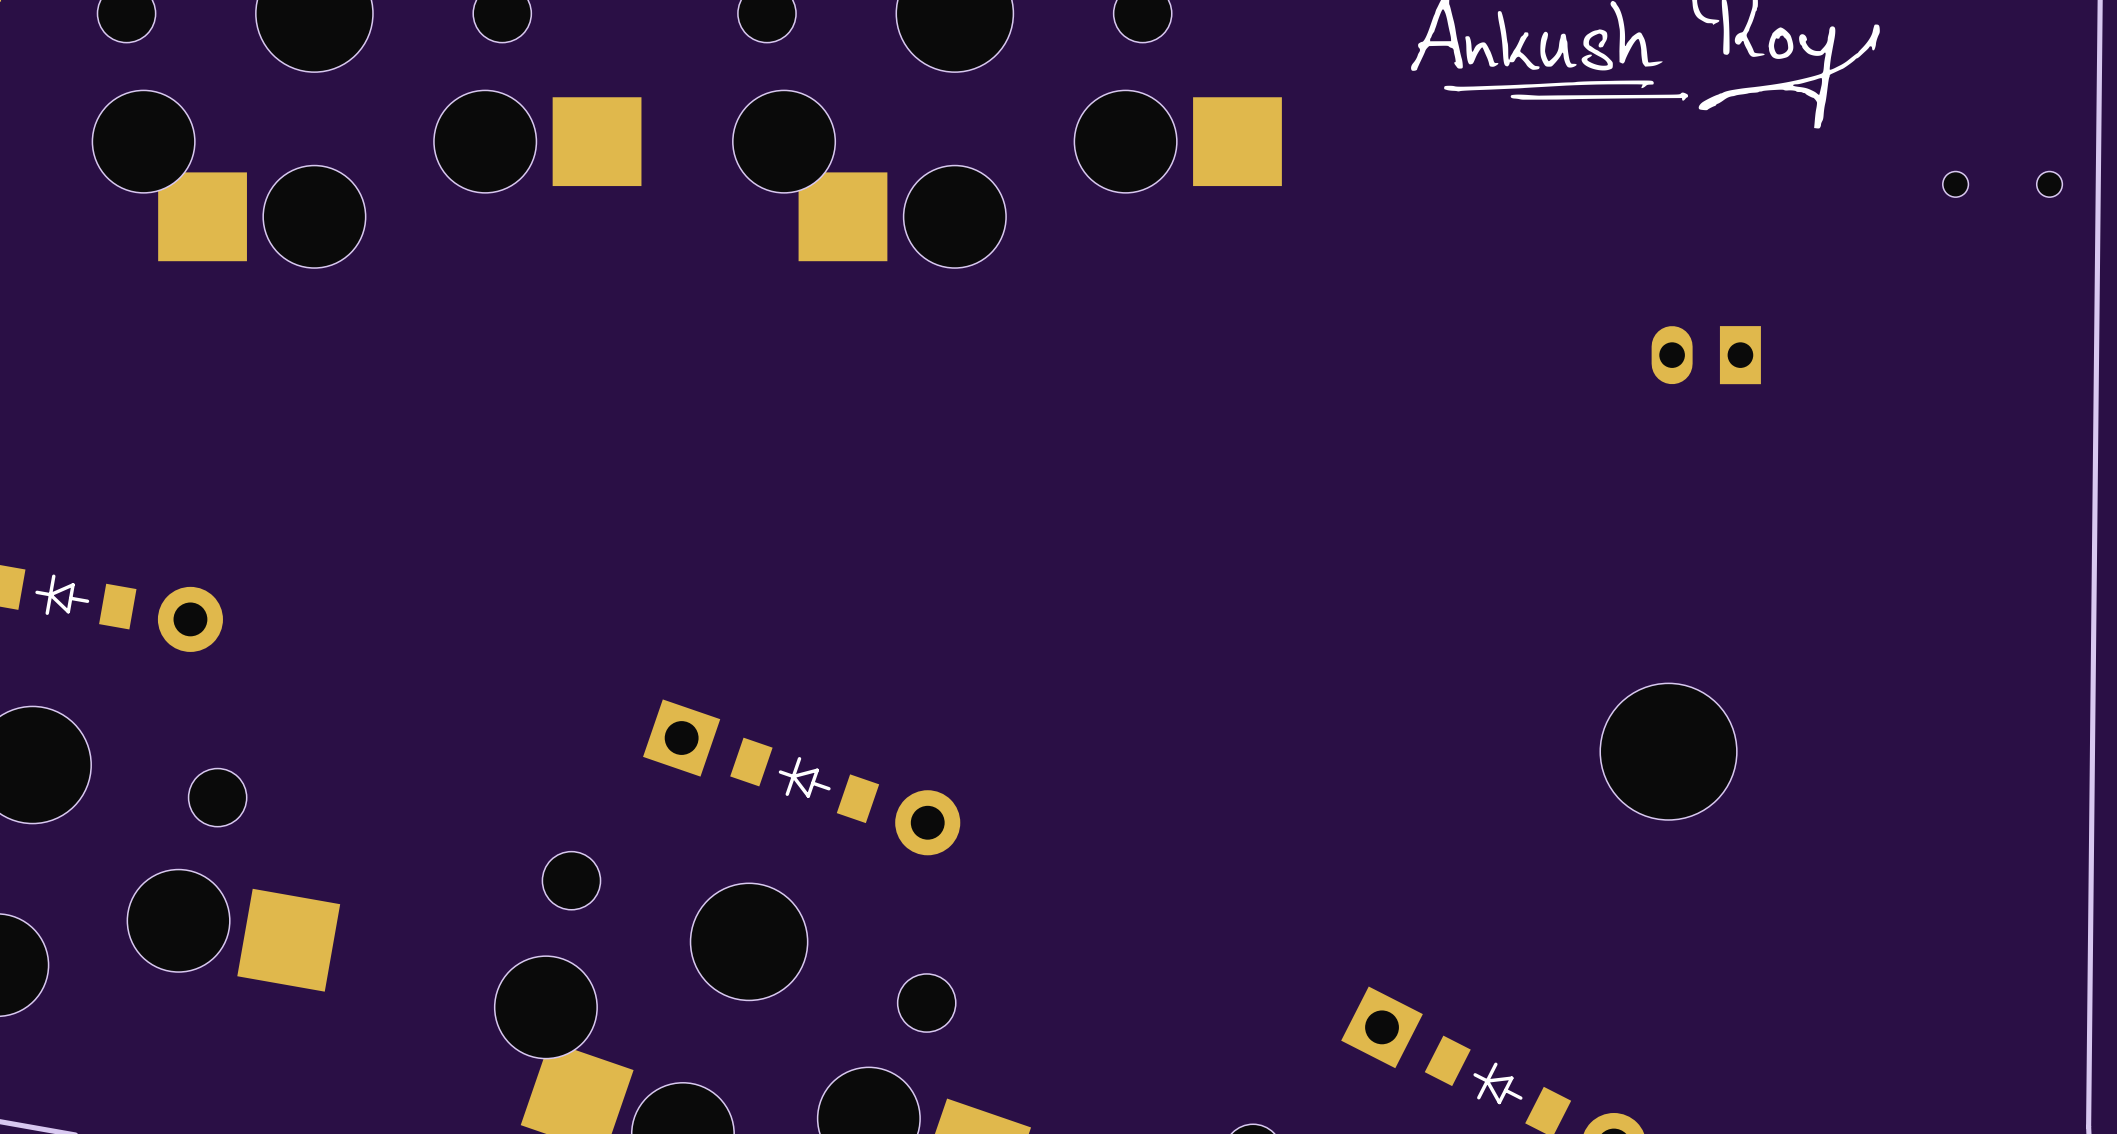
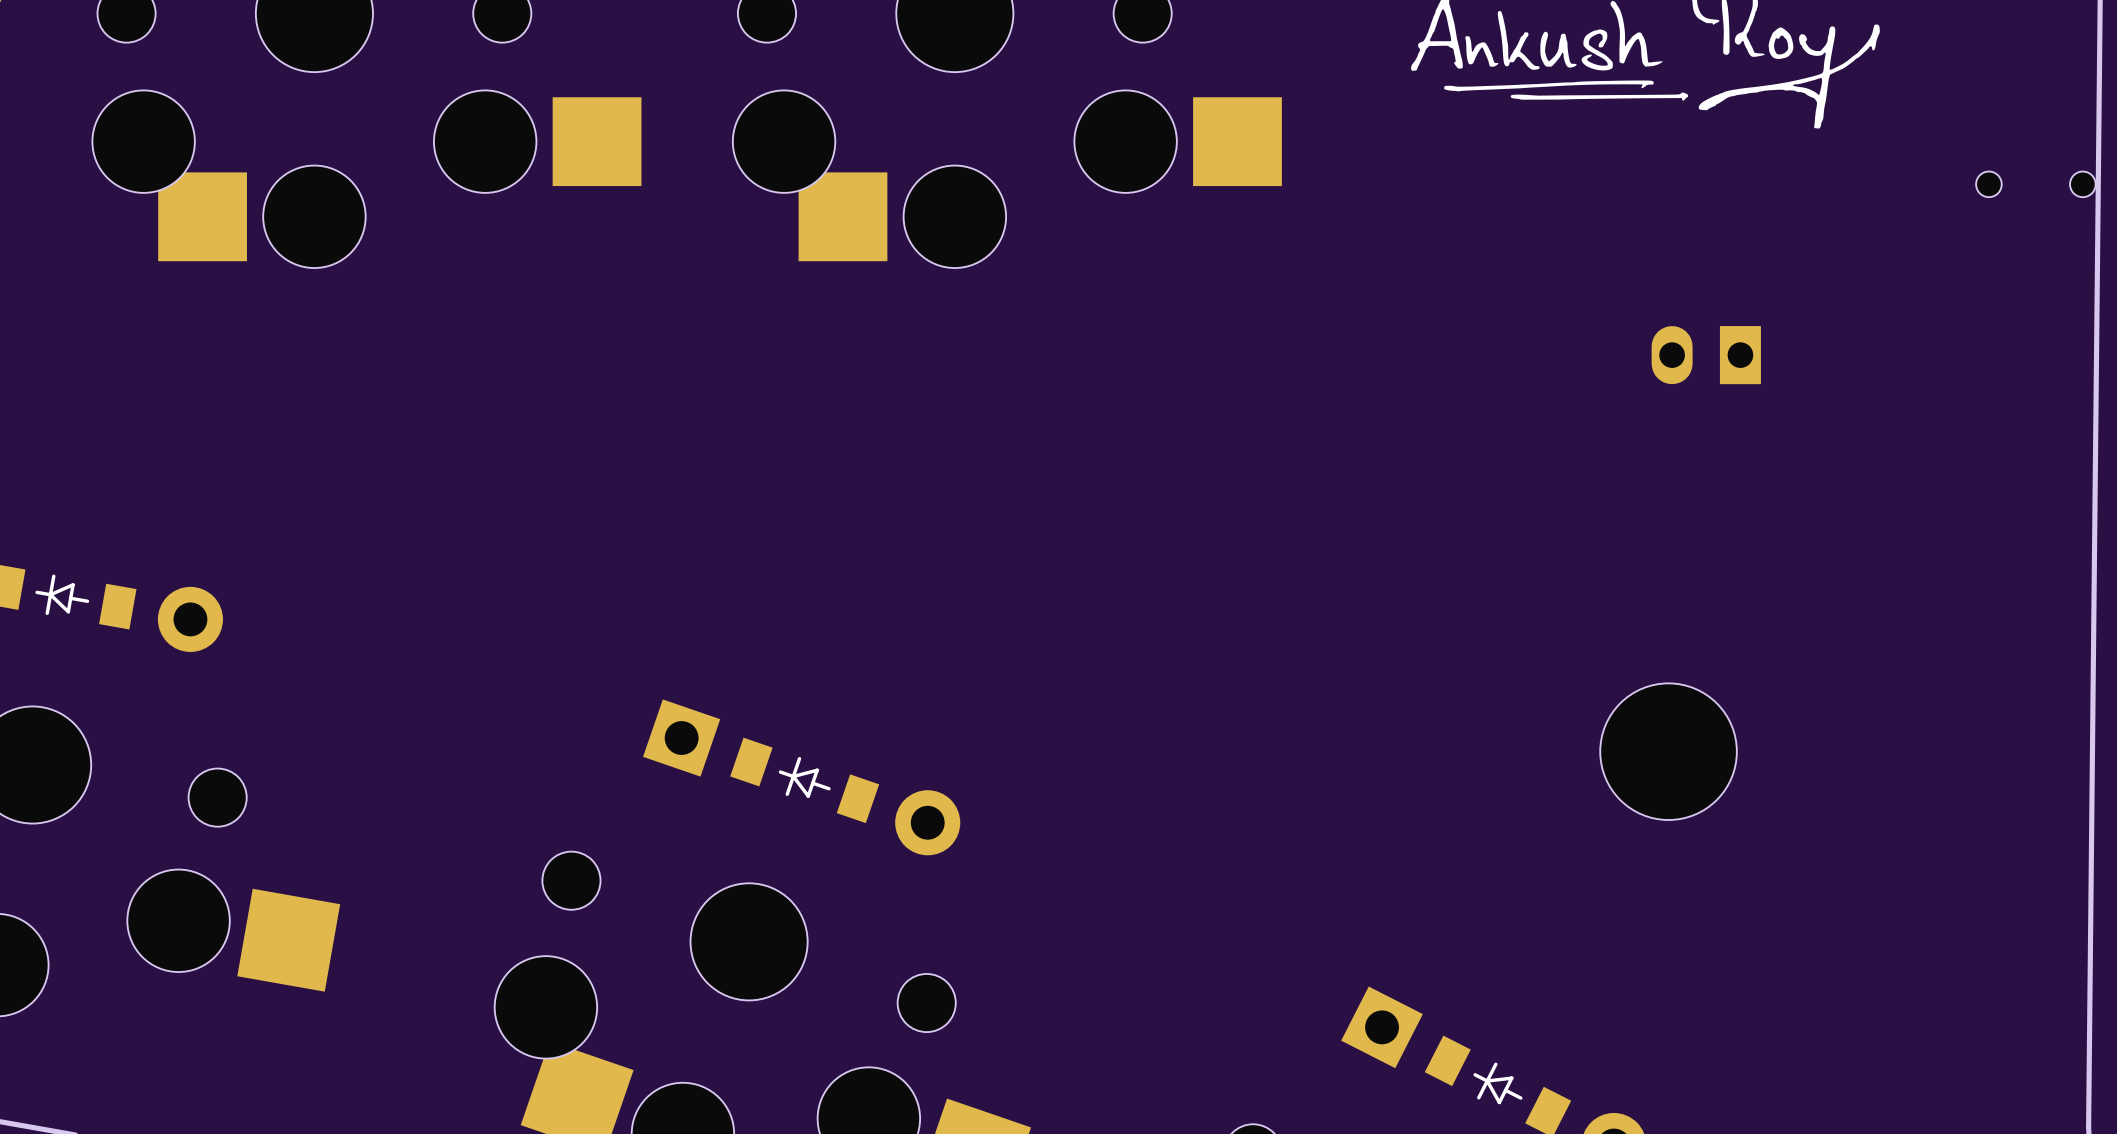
part position: (2002, 184) -> (2035, 184)

